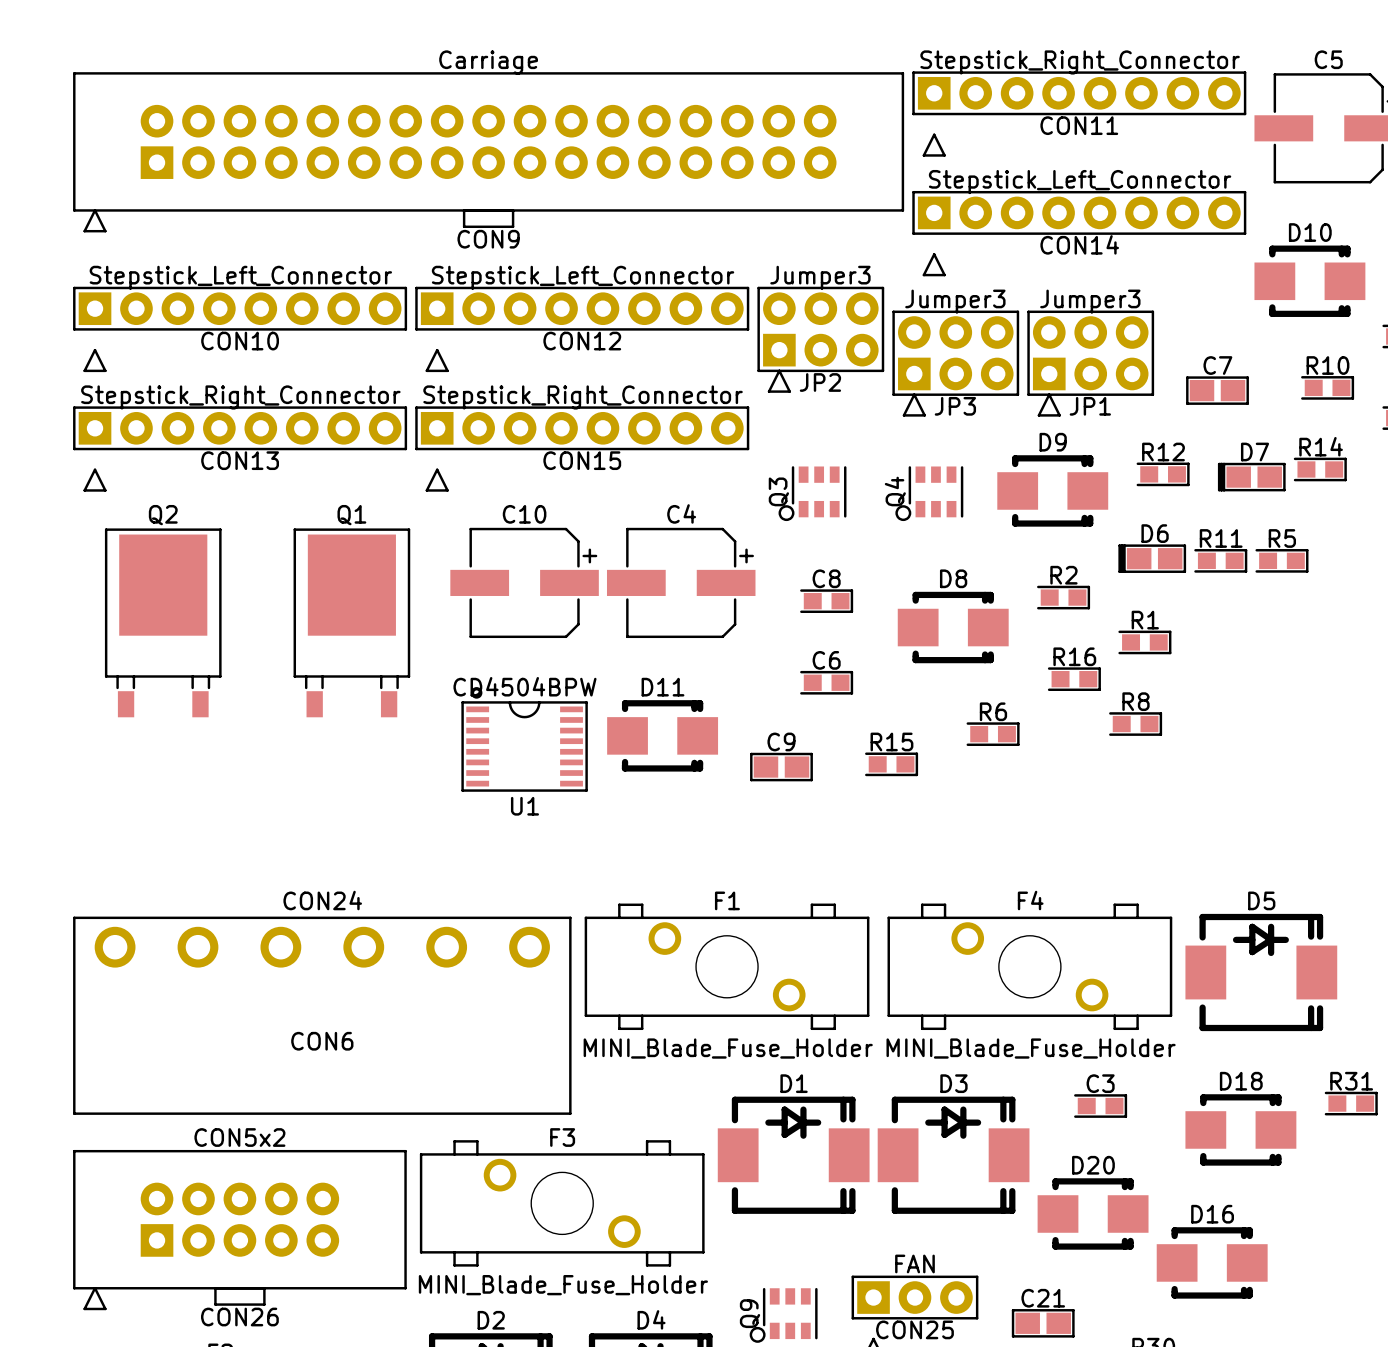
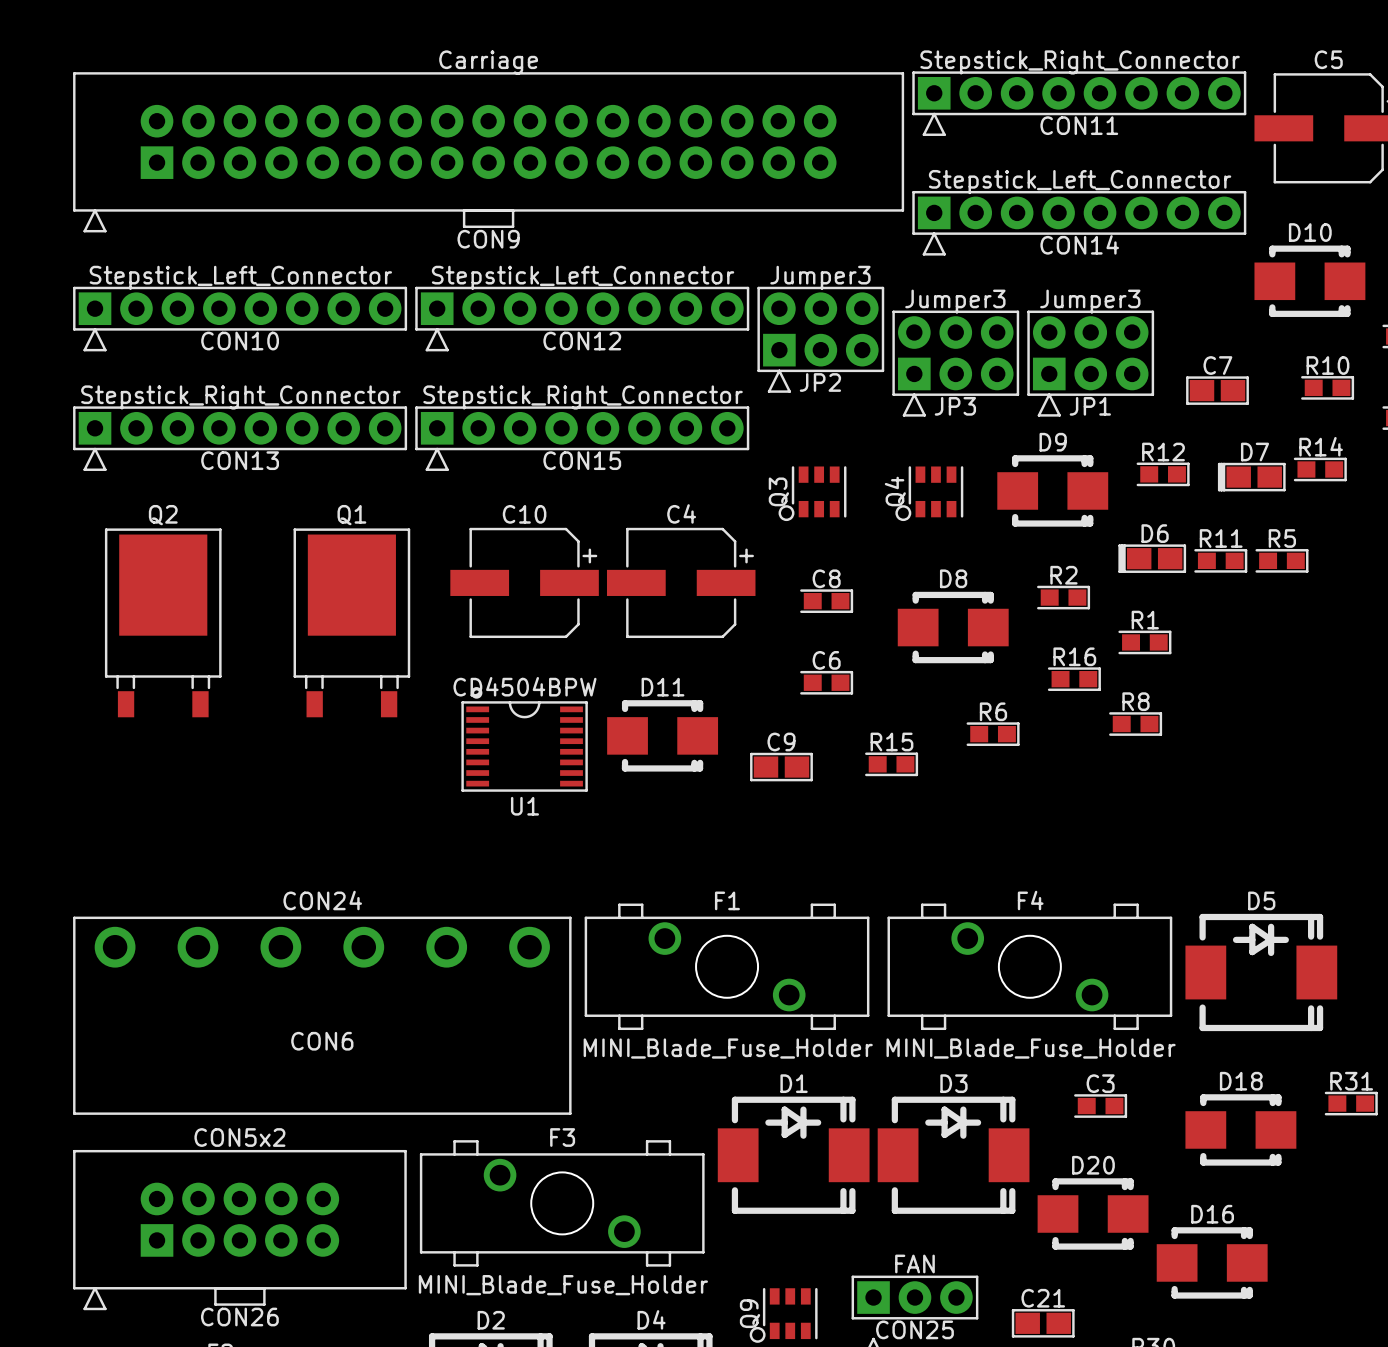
CON11 footprint: [912, 71, 1247, 157] -> [912, 71, 1247, 136]
CON14 footprint: [912, 190, 1247, 277] -> [912, 190, 1247, 256]
CON10 footprint: [73, 286, 408, 373] -> [73, 286, 408, 352]
CON12 footprint: [415, 286, 750, 373] -> [415, 286, 750, 352]
CON13 footprint: [73, 406, 408, 492] -> [73, 406, 408, 471]
CON15 footprint: [415, 406, 750, 492] -> [415, 406, 750, 471]

